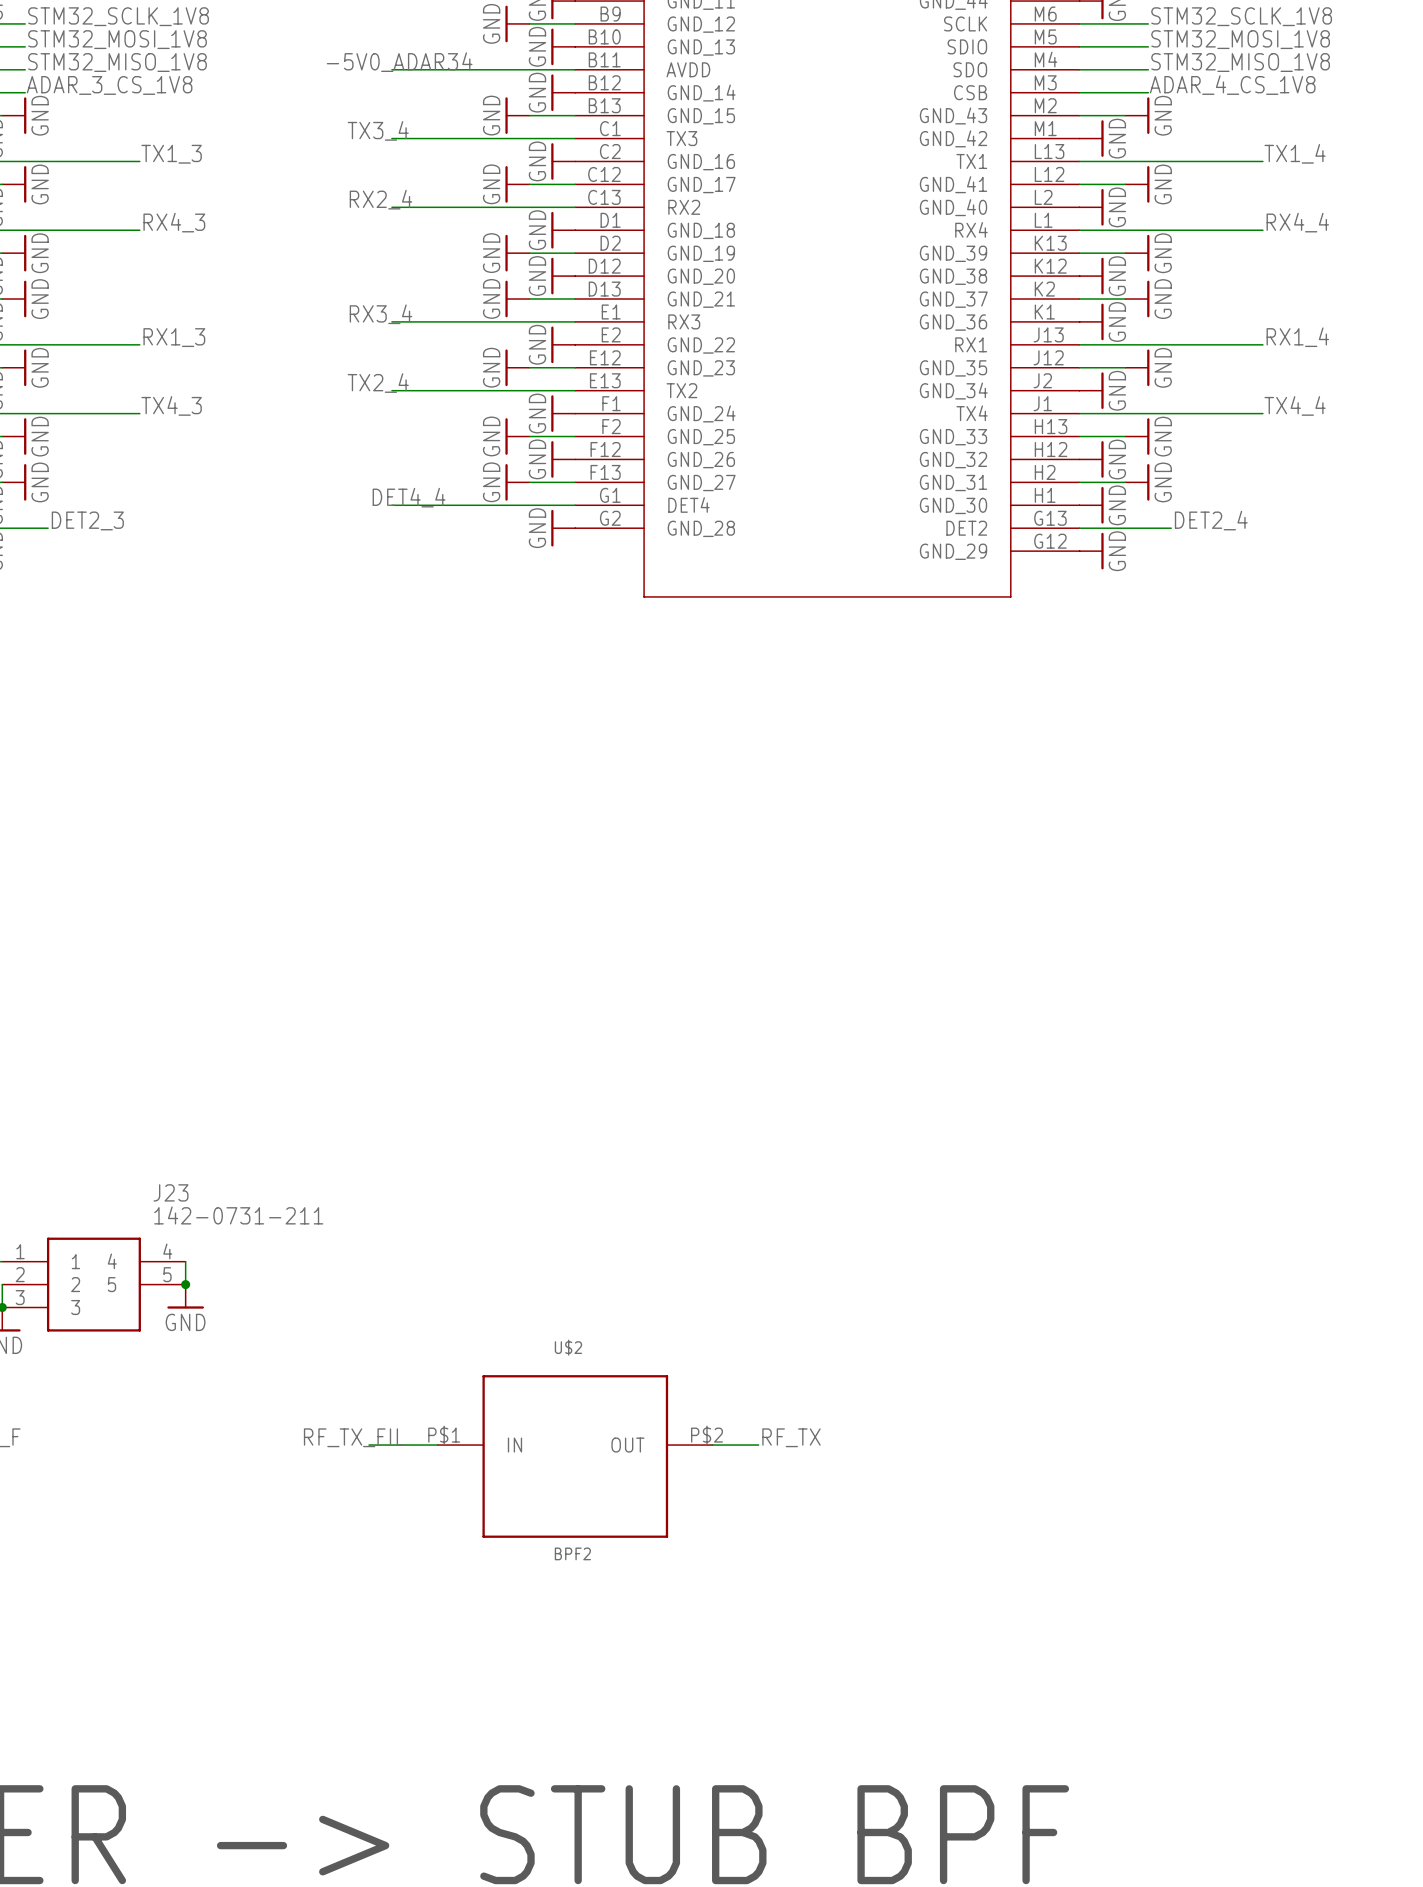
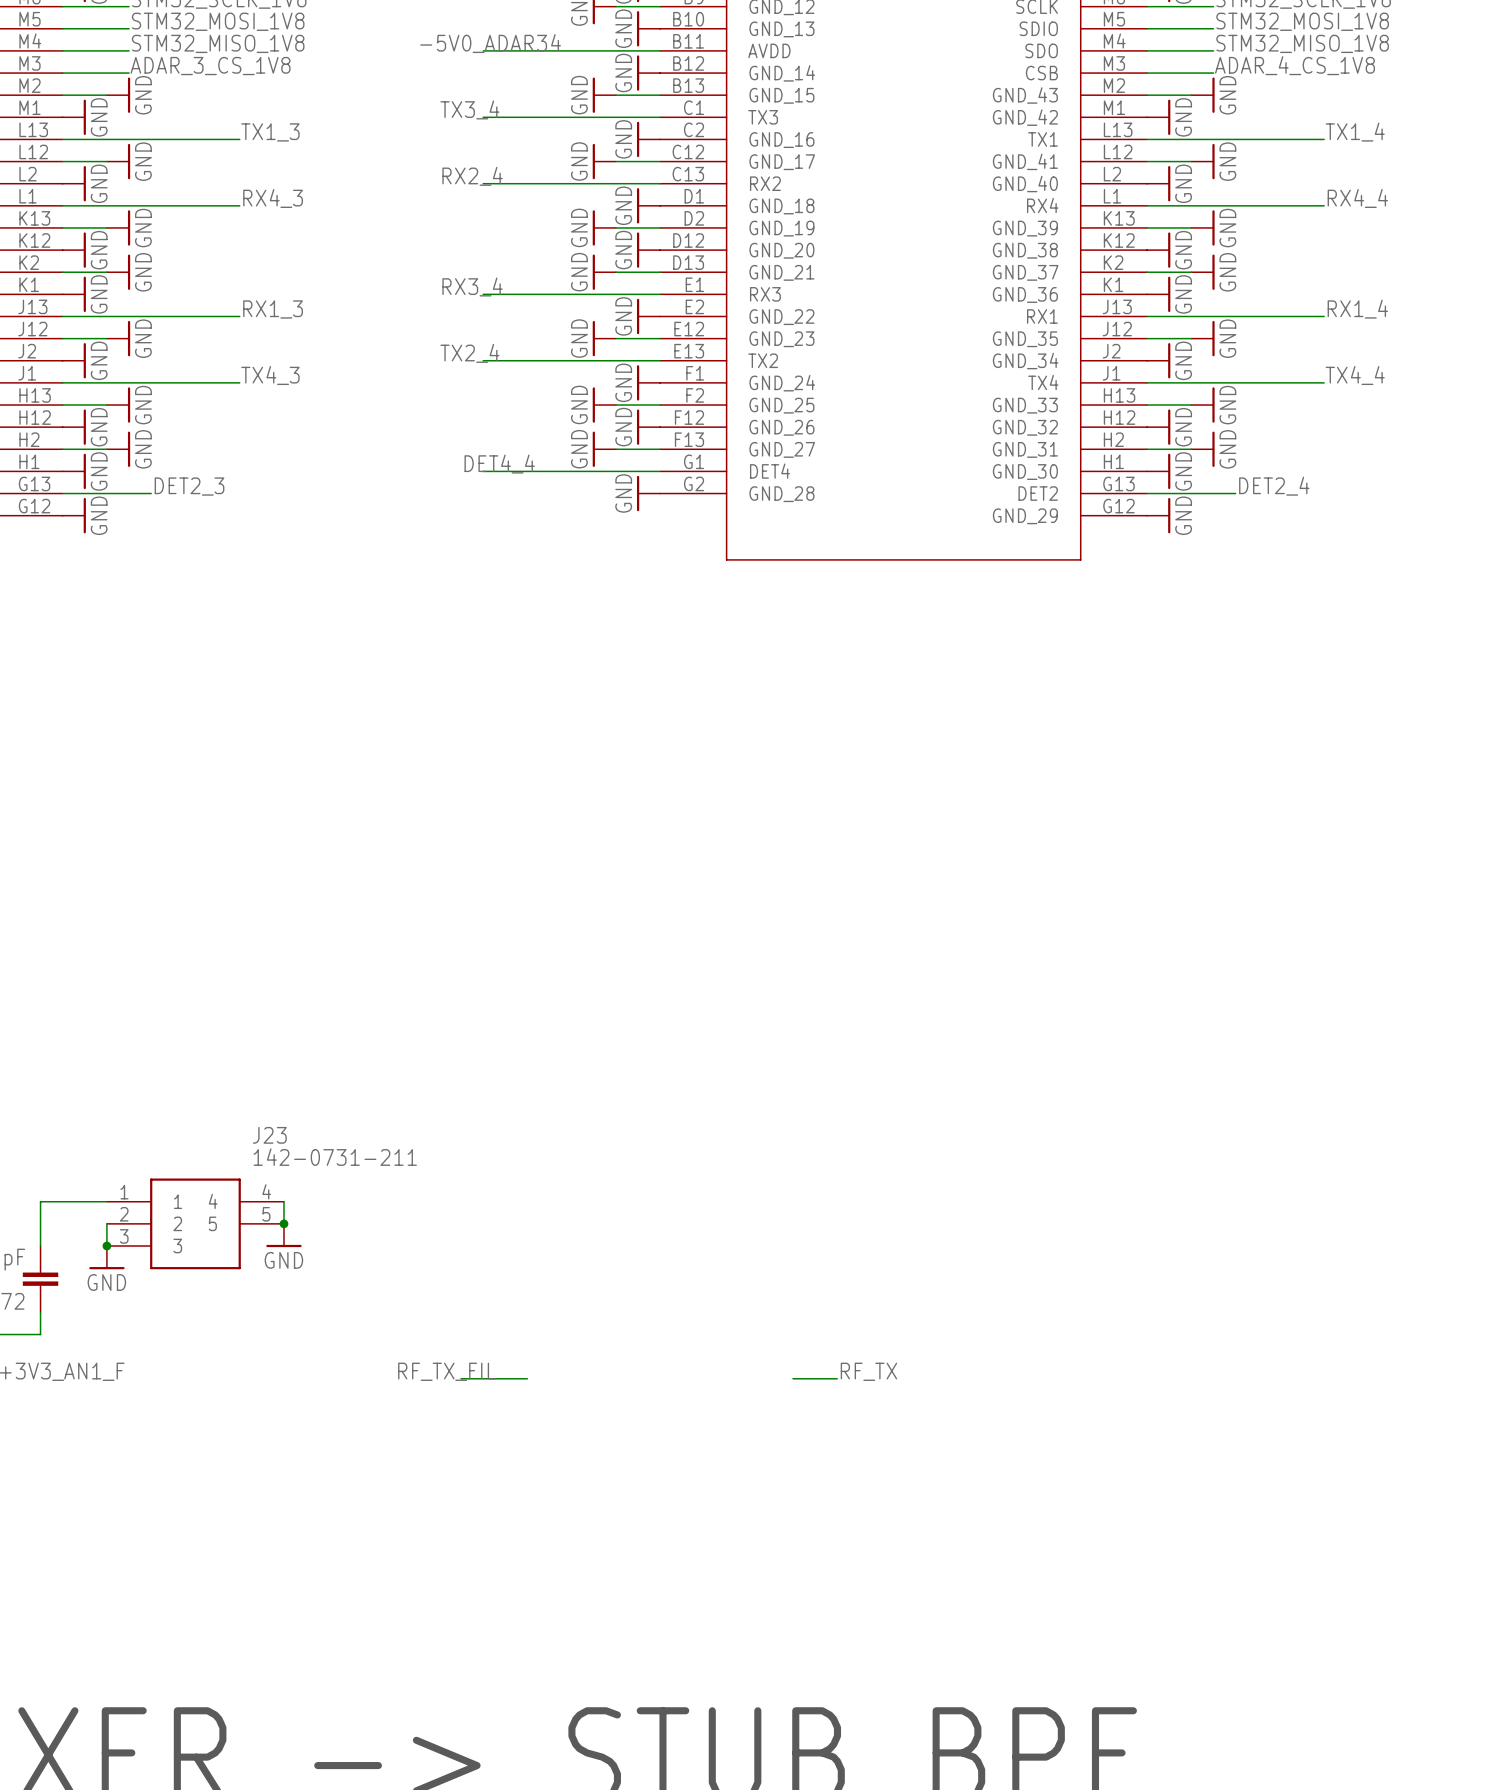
U$2: BPF2 (575, 1456) -> none

